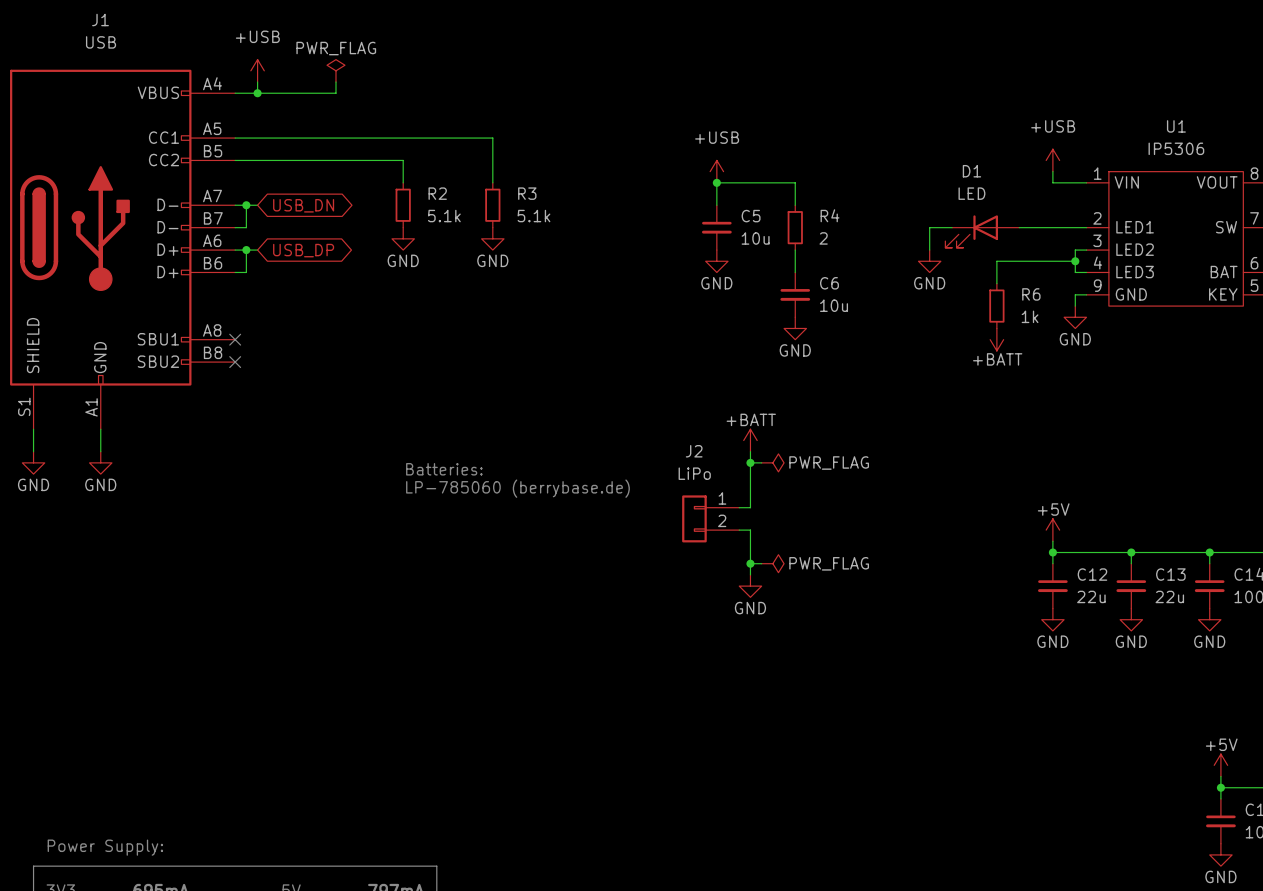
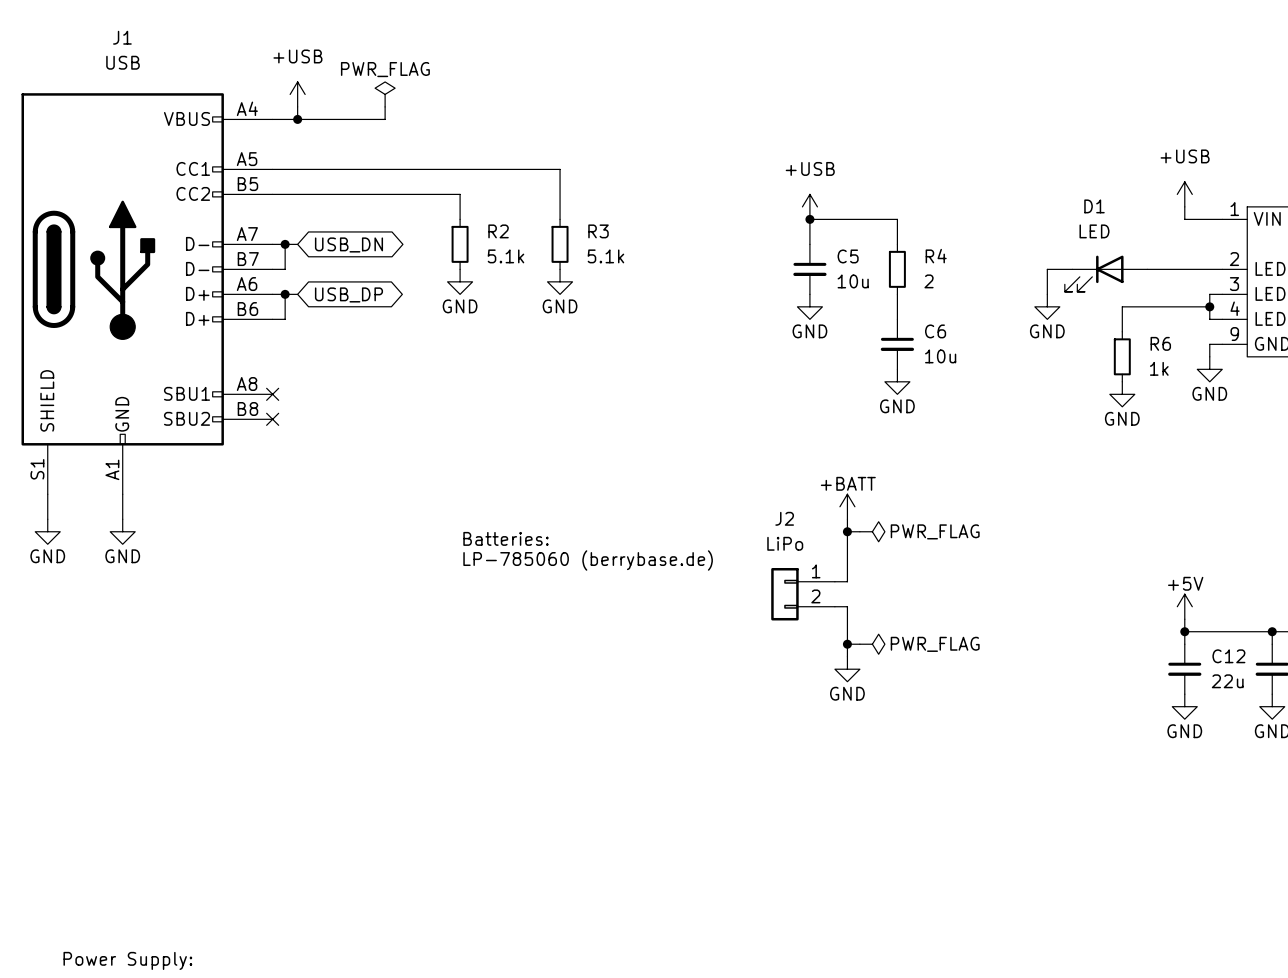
power symbol: +BATT (996, 339) -> GND (1122, 394)

